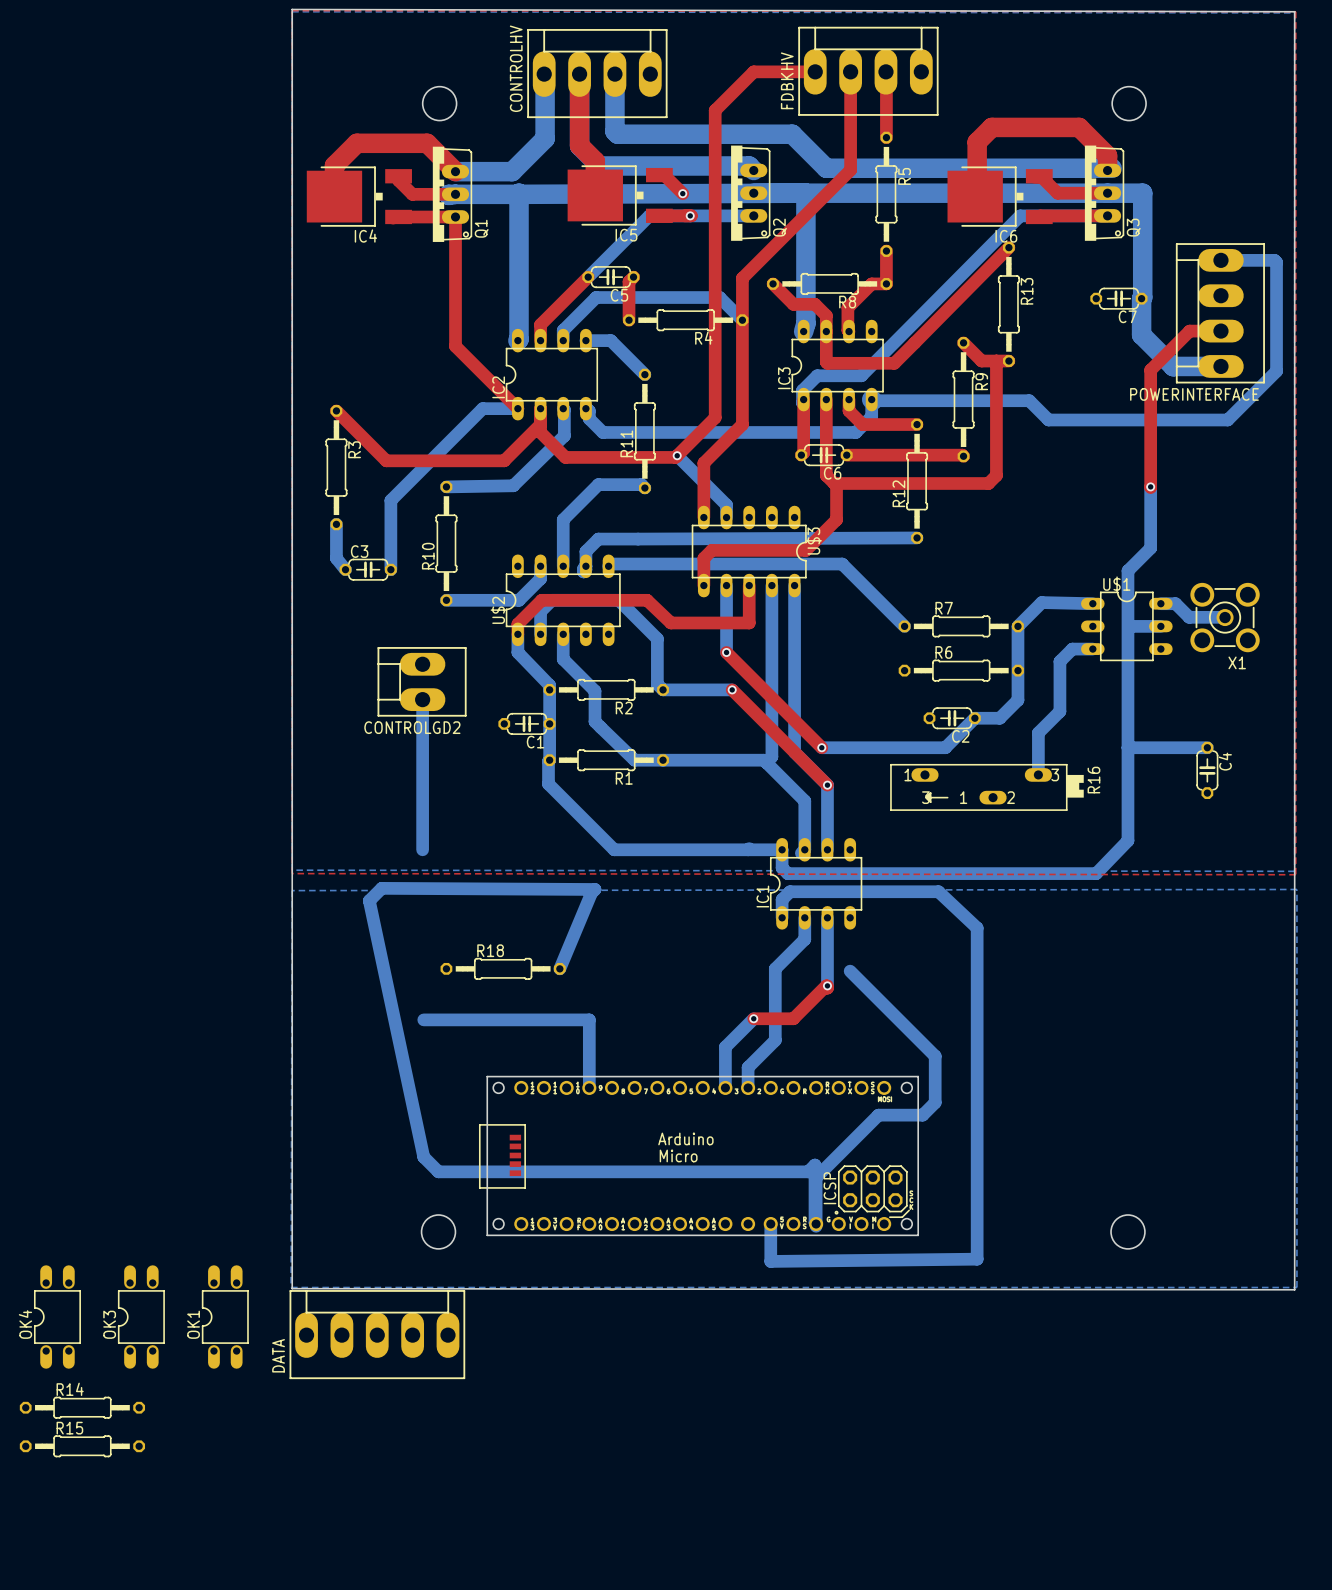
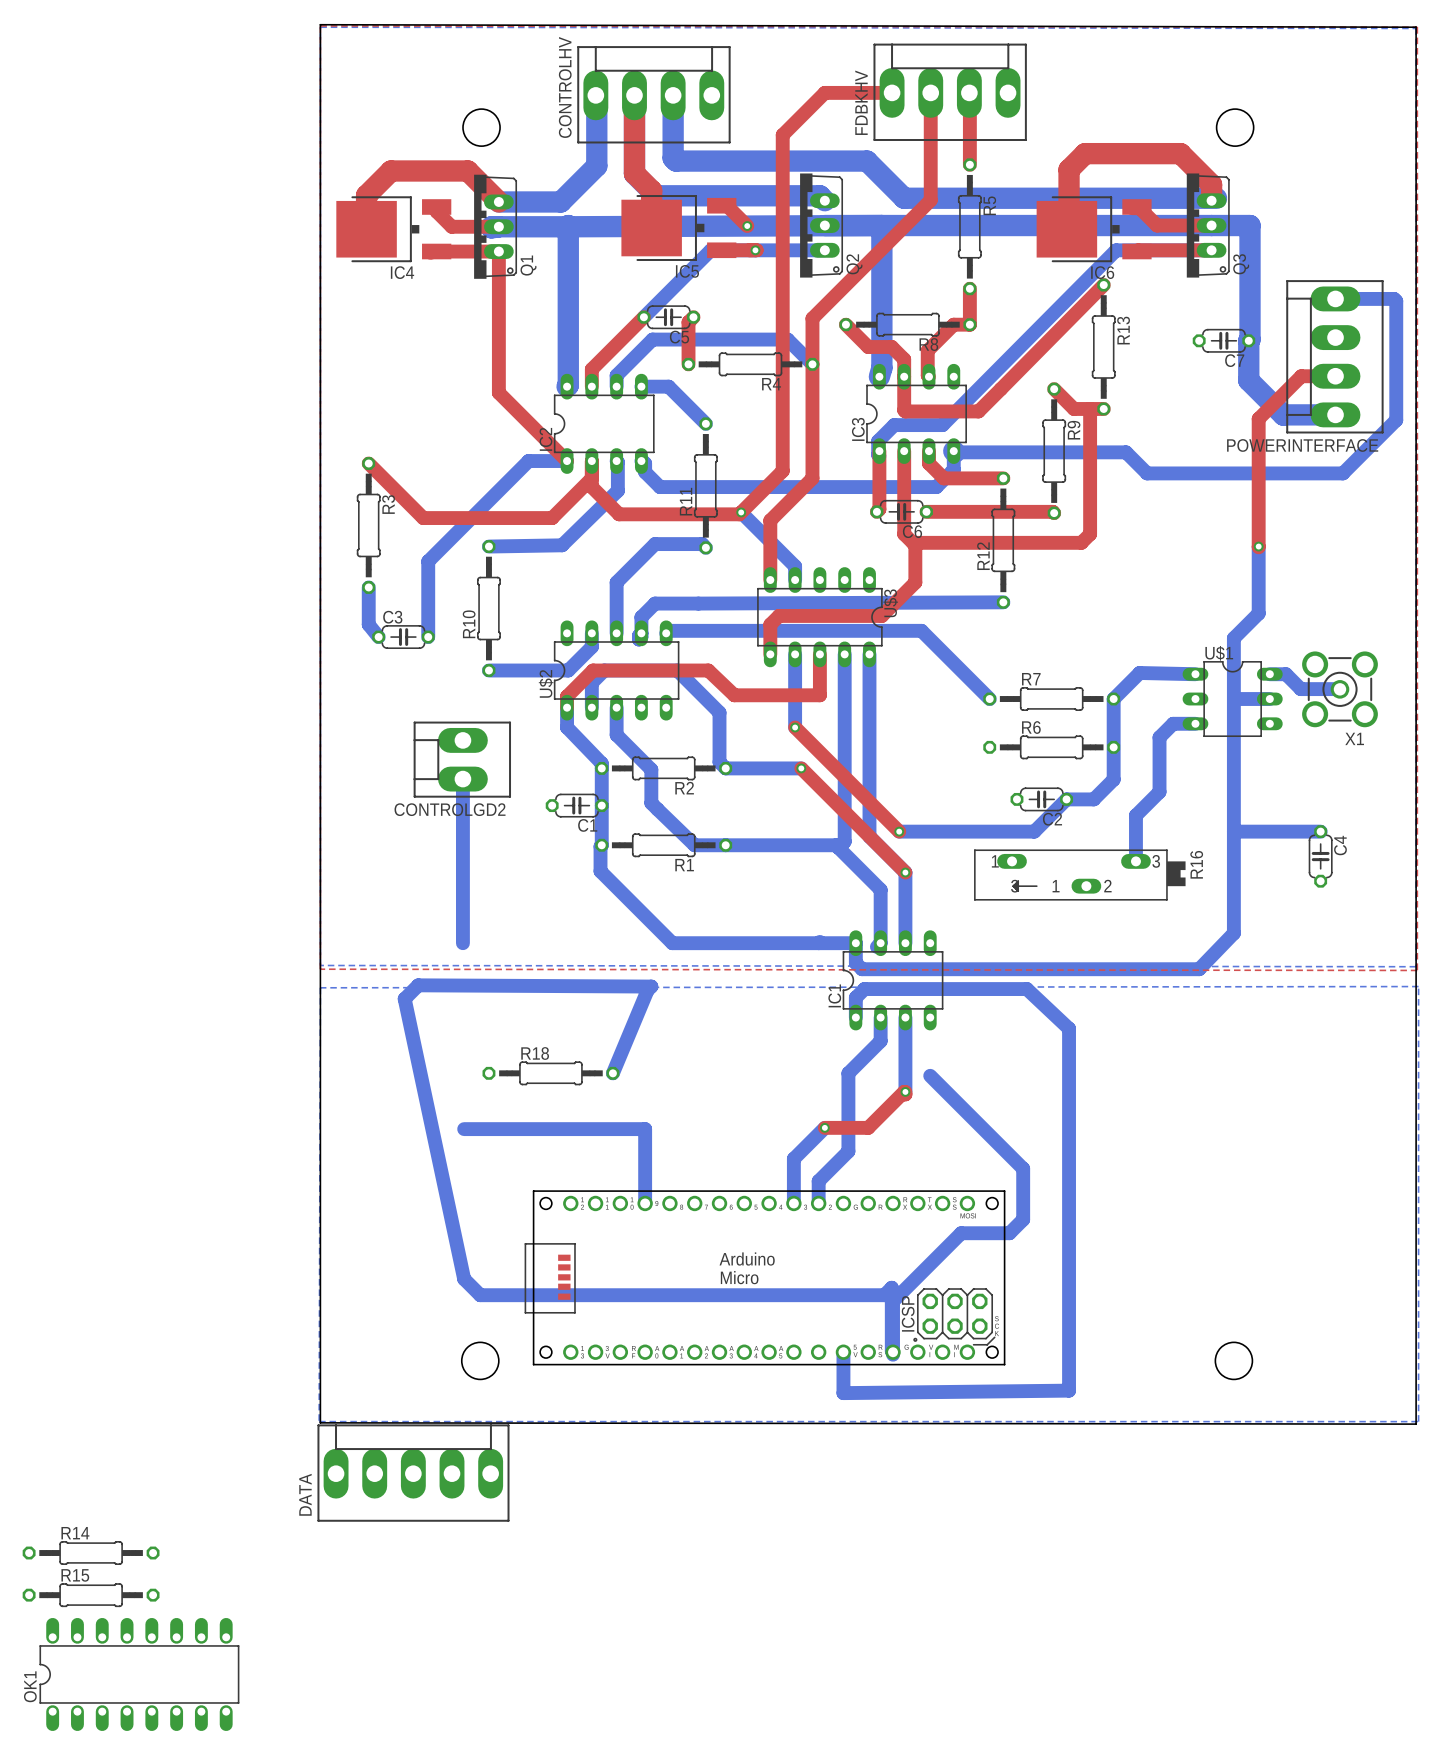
OK1 footprint: [201, 1265, 249, 1369] -> [39, 1617, 240, 1732]
OK4: (57, 1317) -> none
OK3: (141, 1317) -> none
OK1 name position: OK1 (193, 1324) -> OK1 (30, 1686)

